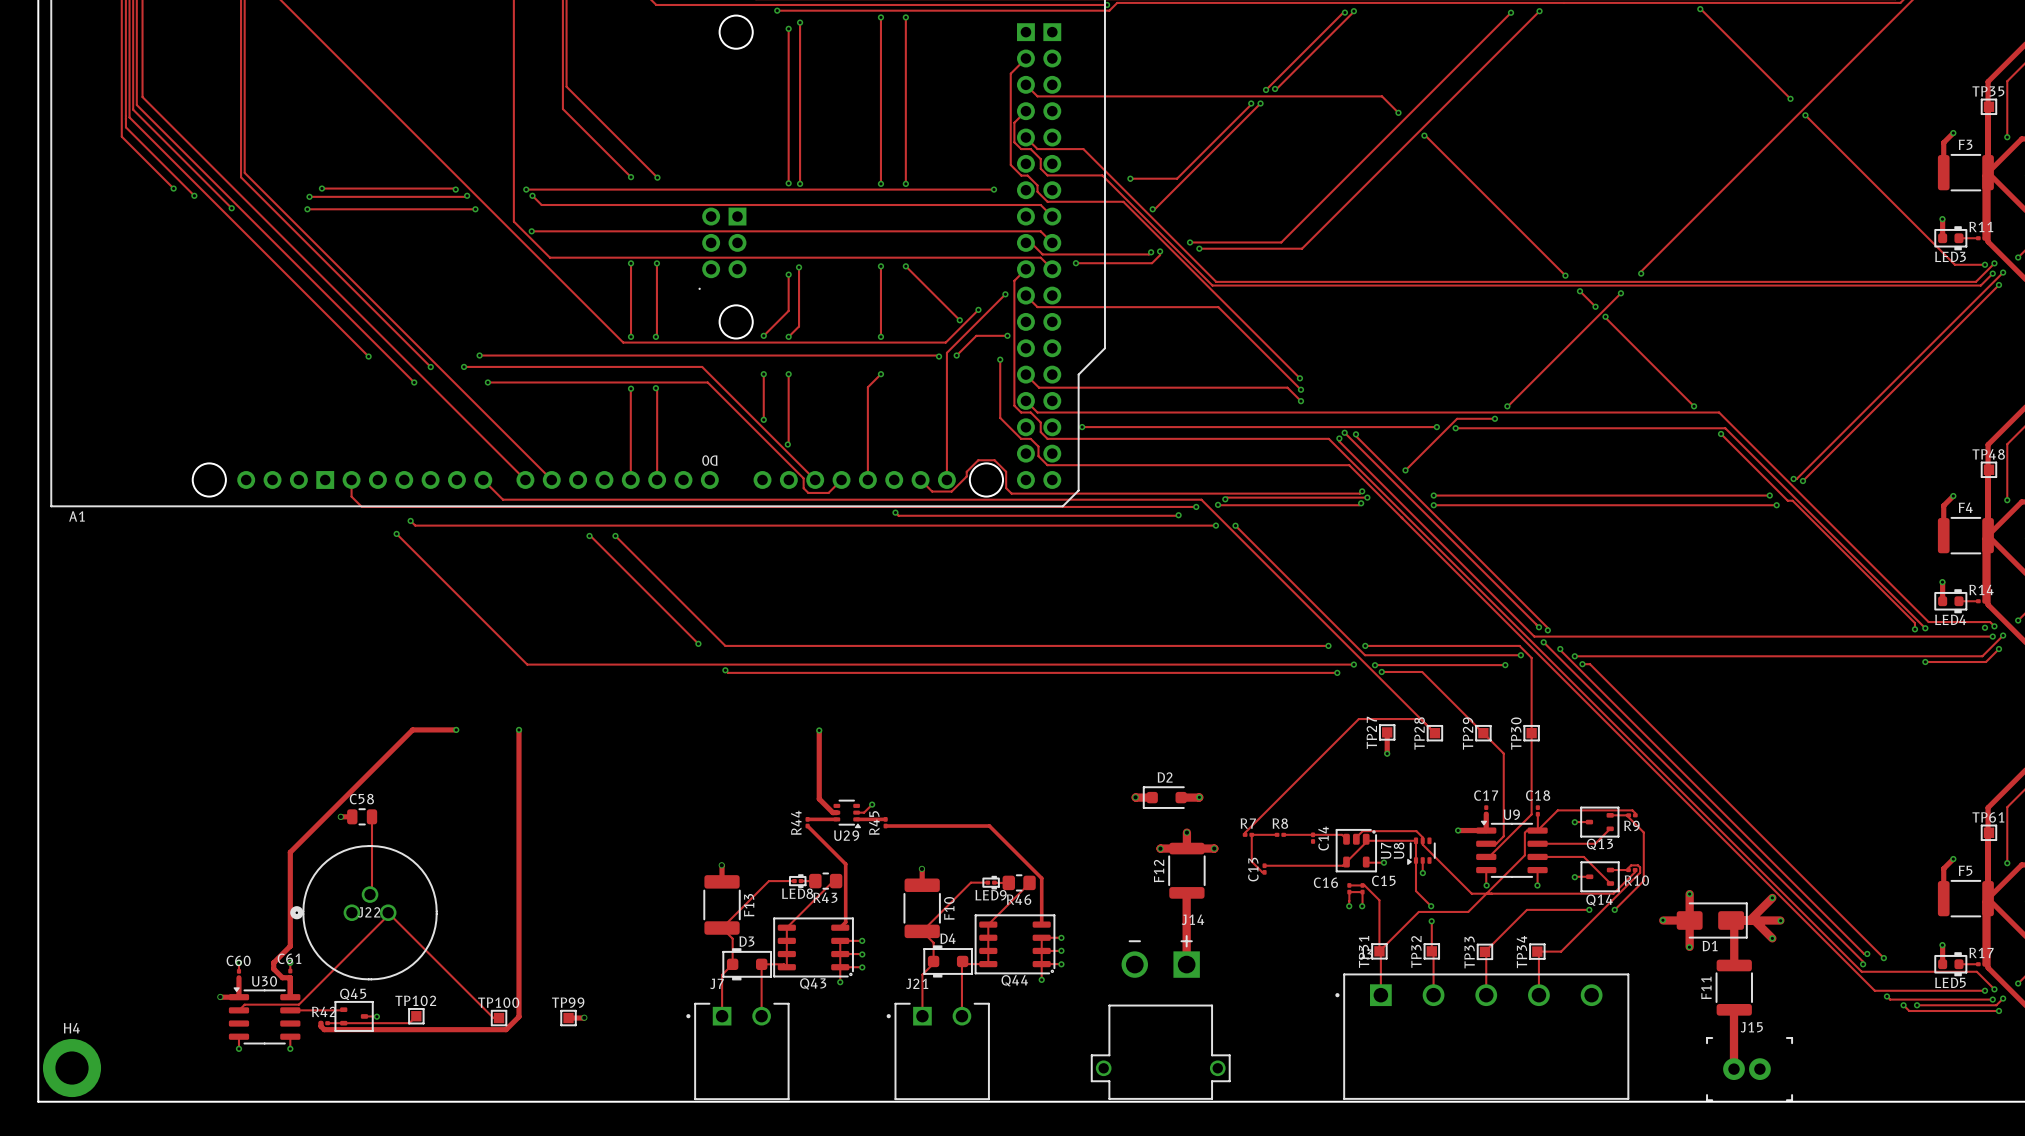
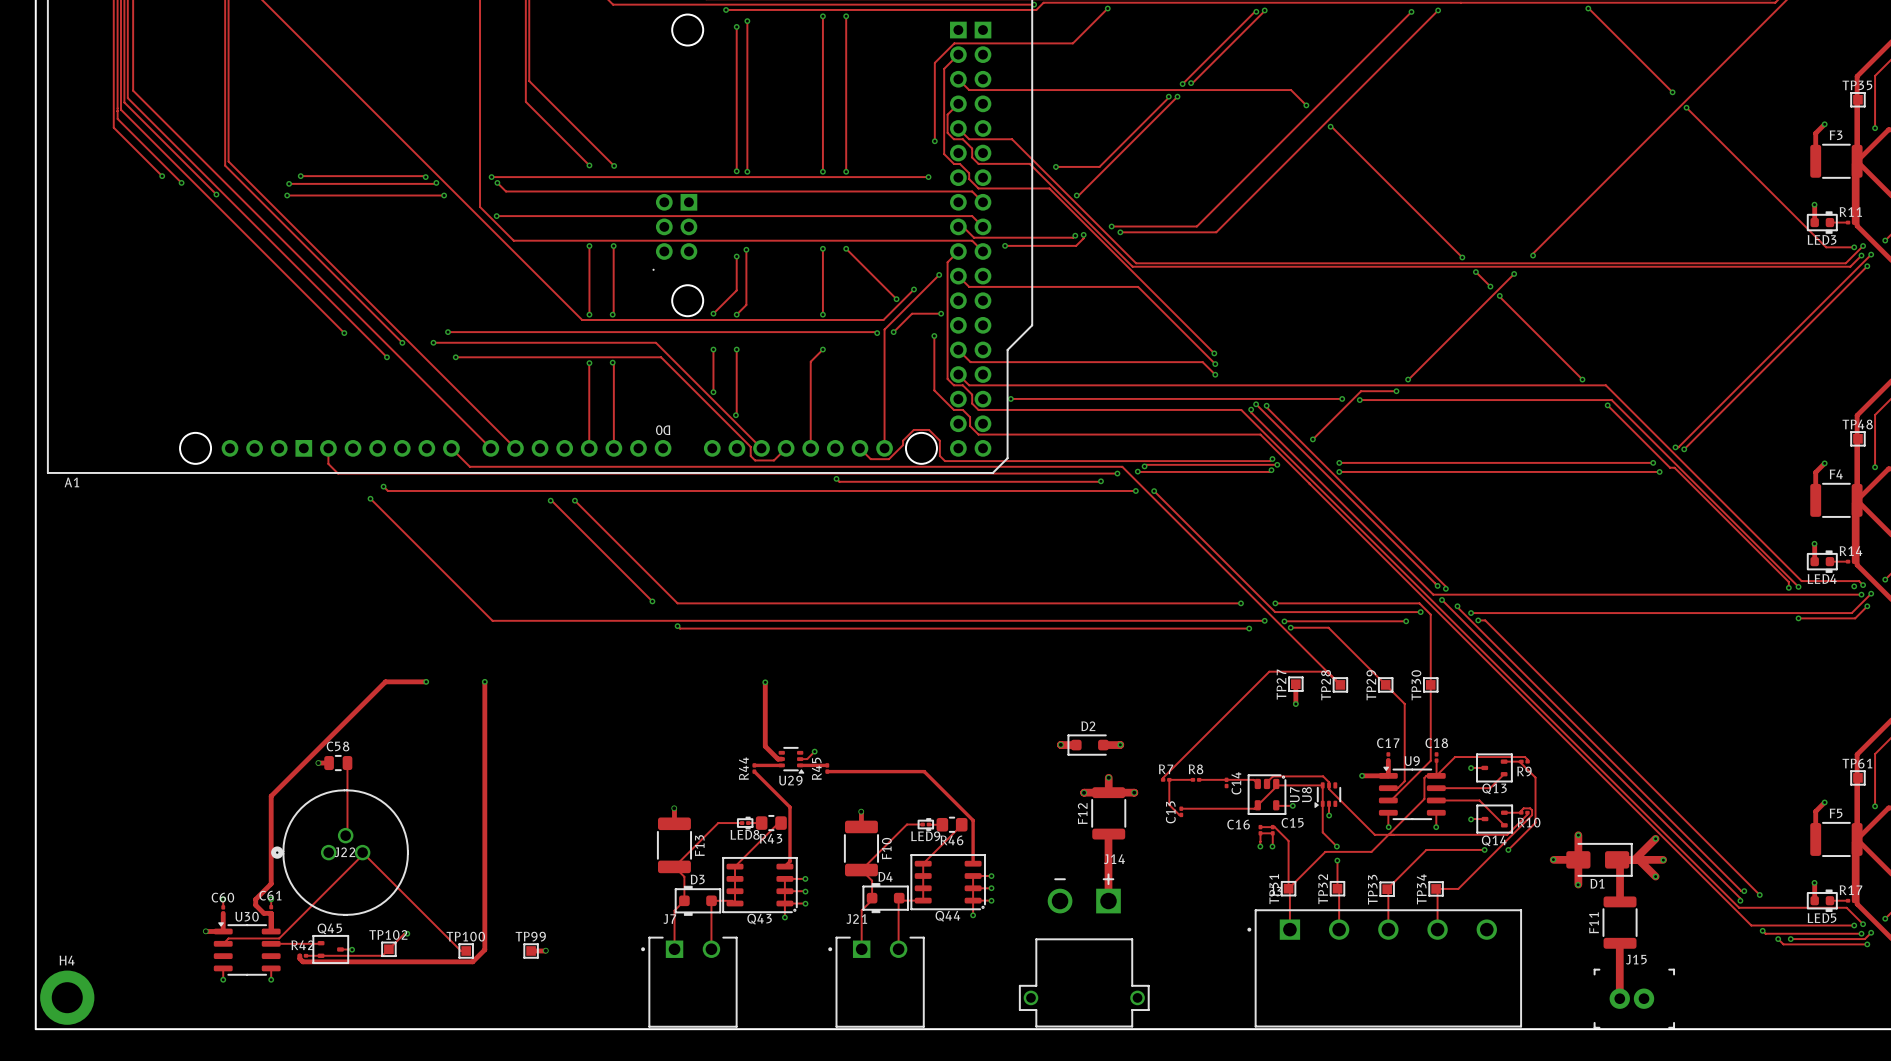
track: none -> (1107, 8) (1072, 43) (954, 43) (934, 62) (934, 141)
via: none -> (1107, 8)
via: none -> (934, 141)
track: none -> (407, 933) (404, 933) (388, 949)
via: none -> (407, 933)

